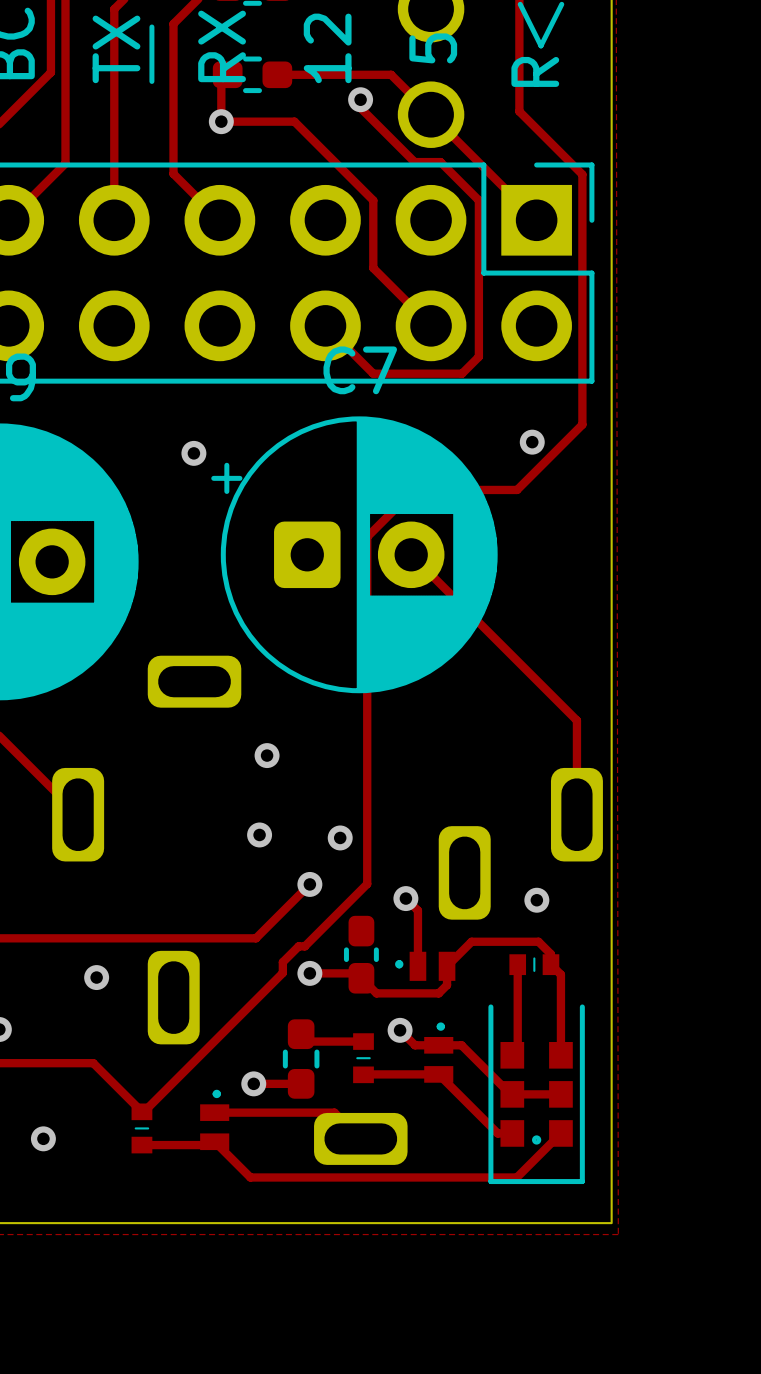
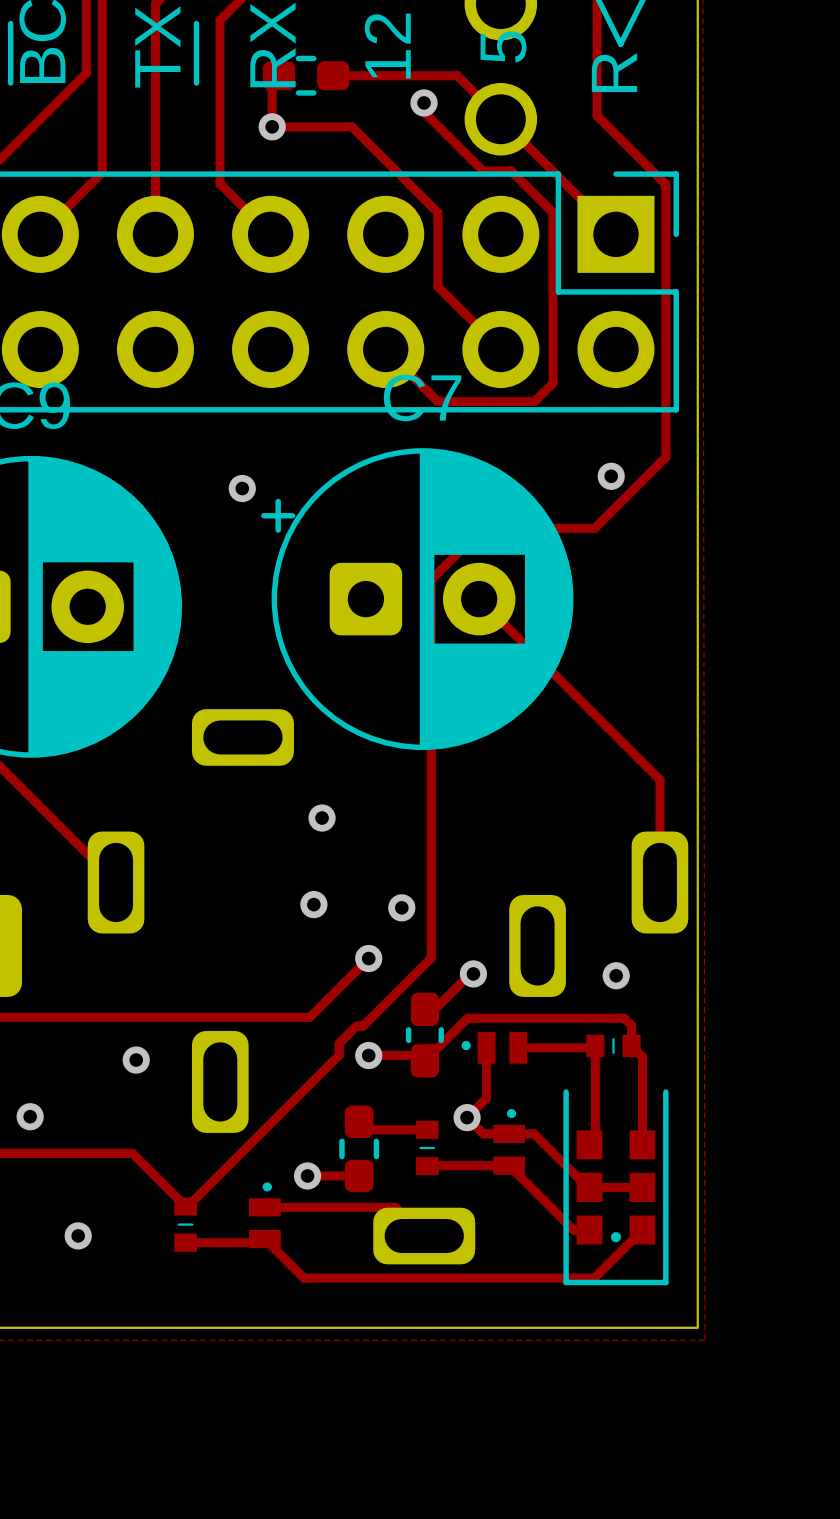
track: none -> (472, 971) (434, 1009) (424, 1009)
track: (405, 898) (417, 910) (417, 966) -> (467, 1117) (486, 1098) (486, 1047)
track: (550, 954) (538, 941) (471, 941) (447, 966) (447, 985) (438, 993) (376, 993) (361, 978) -> (631, 1034) (631, 1025) (624, 1018) (467, 1018) (424, 1060)
track: none -> (595, 1046) (593, 1047) (518, 1047)

